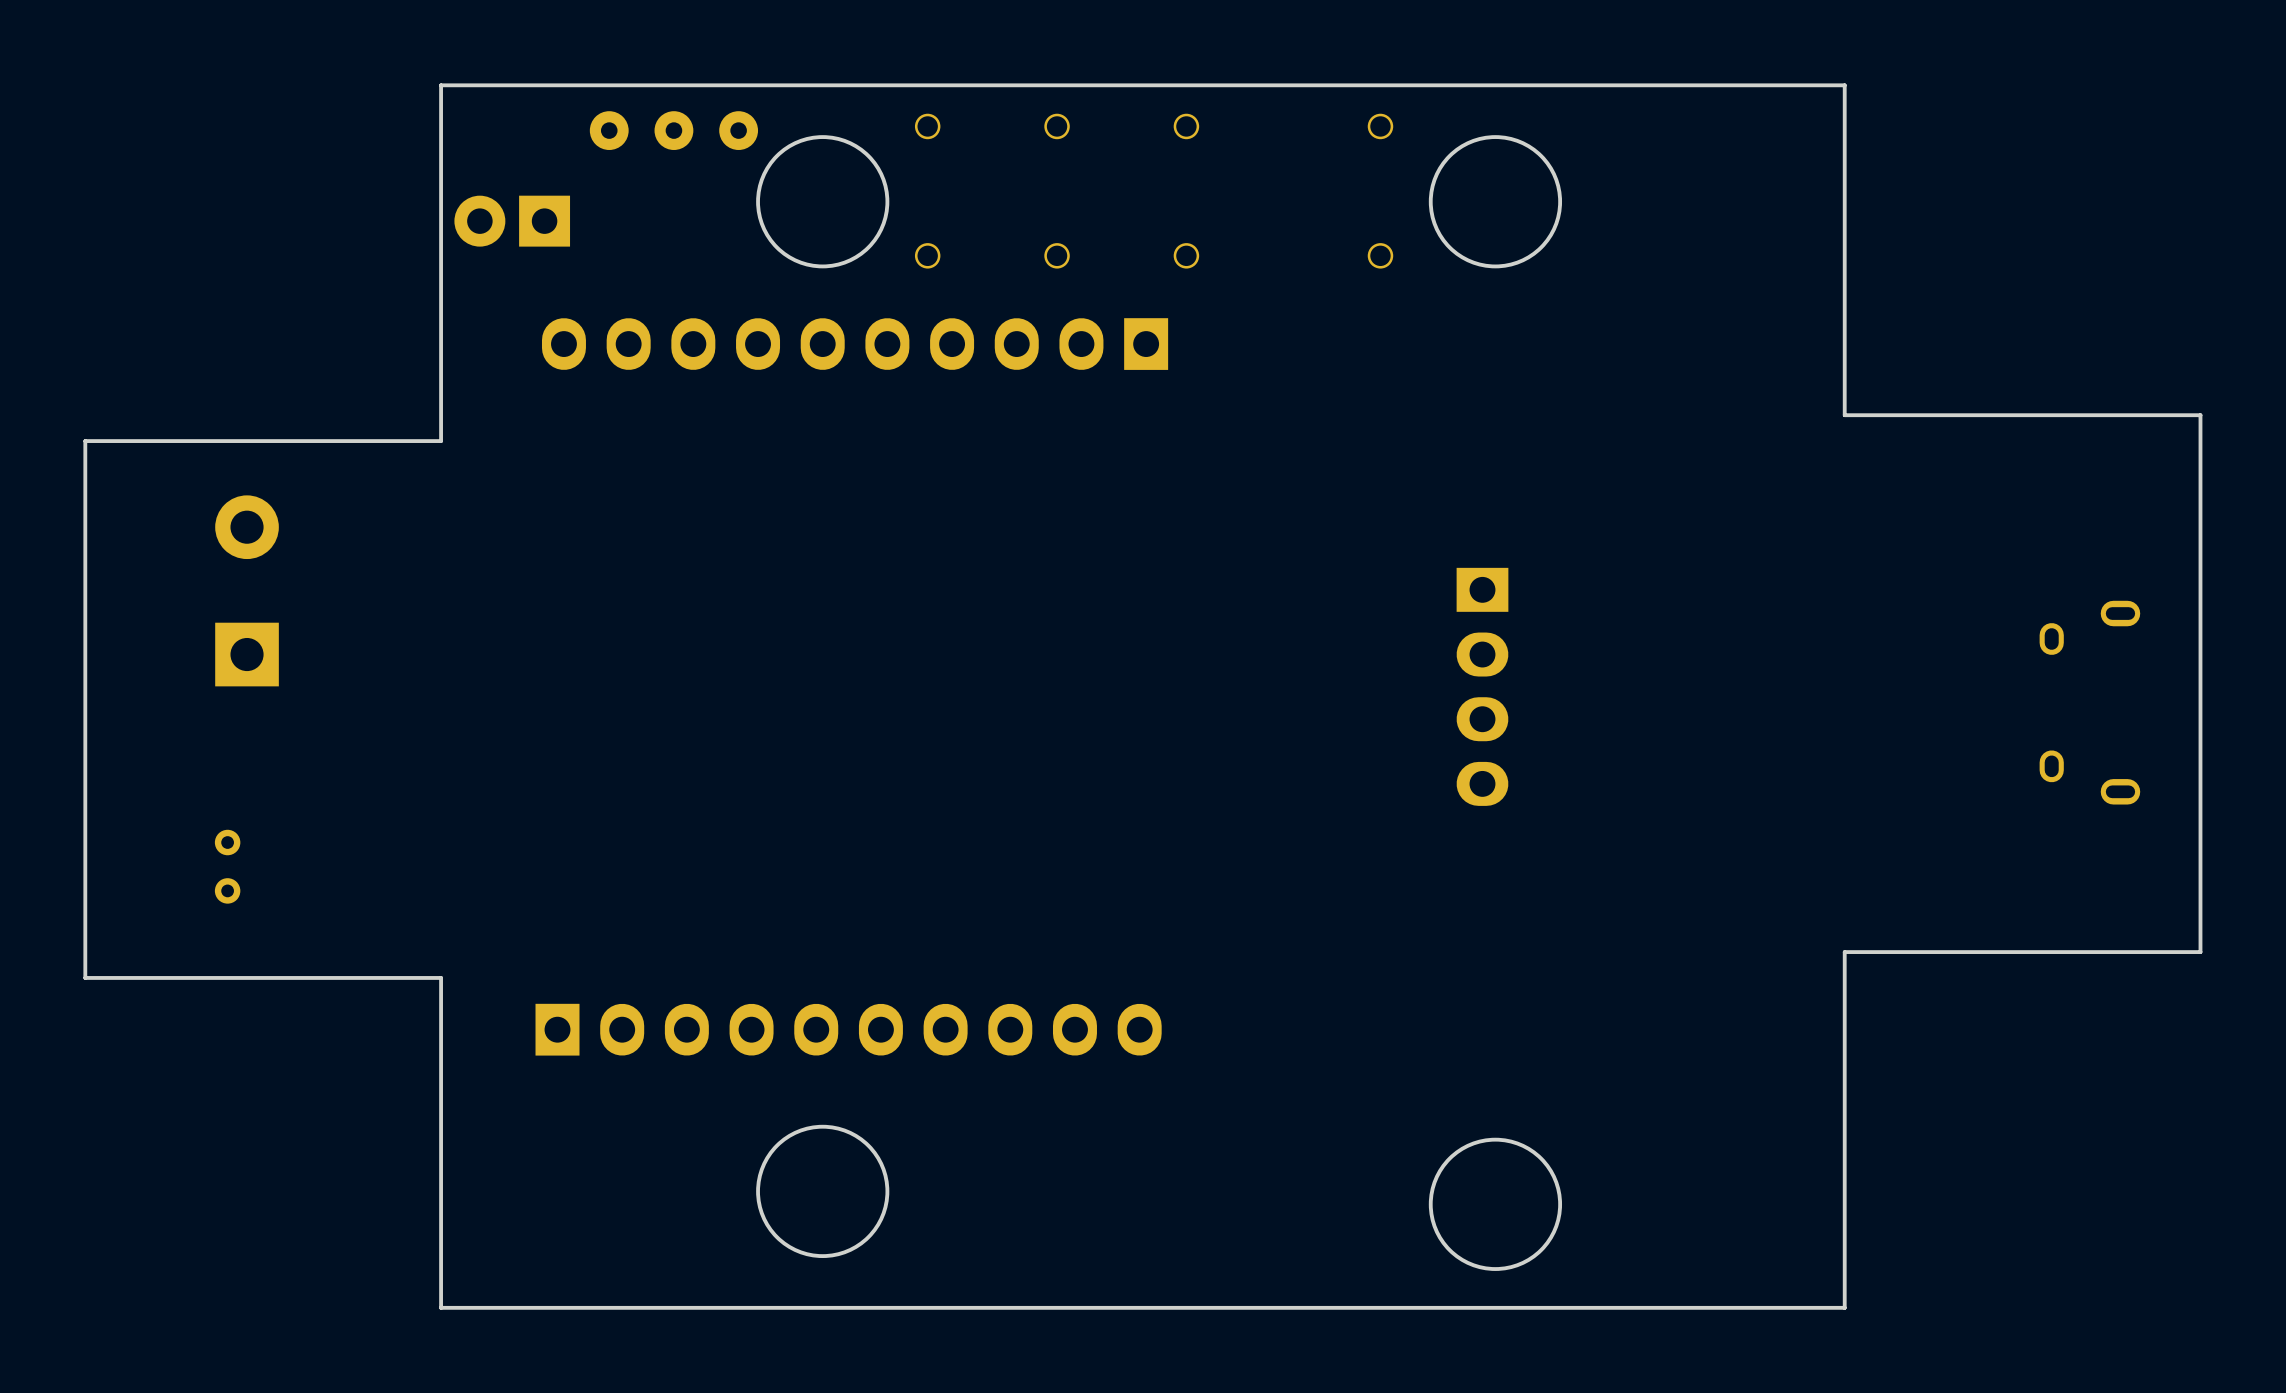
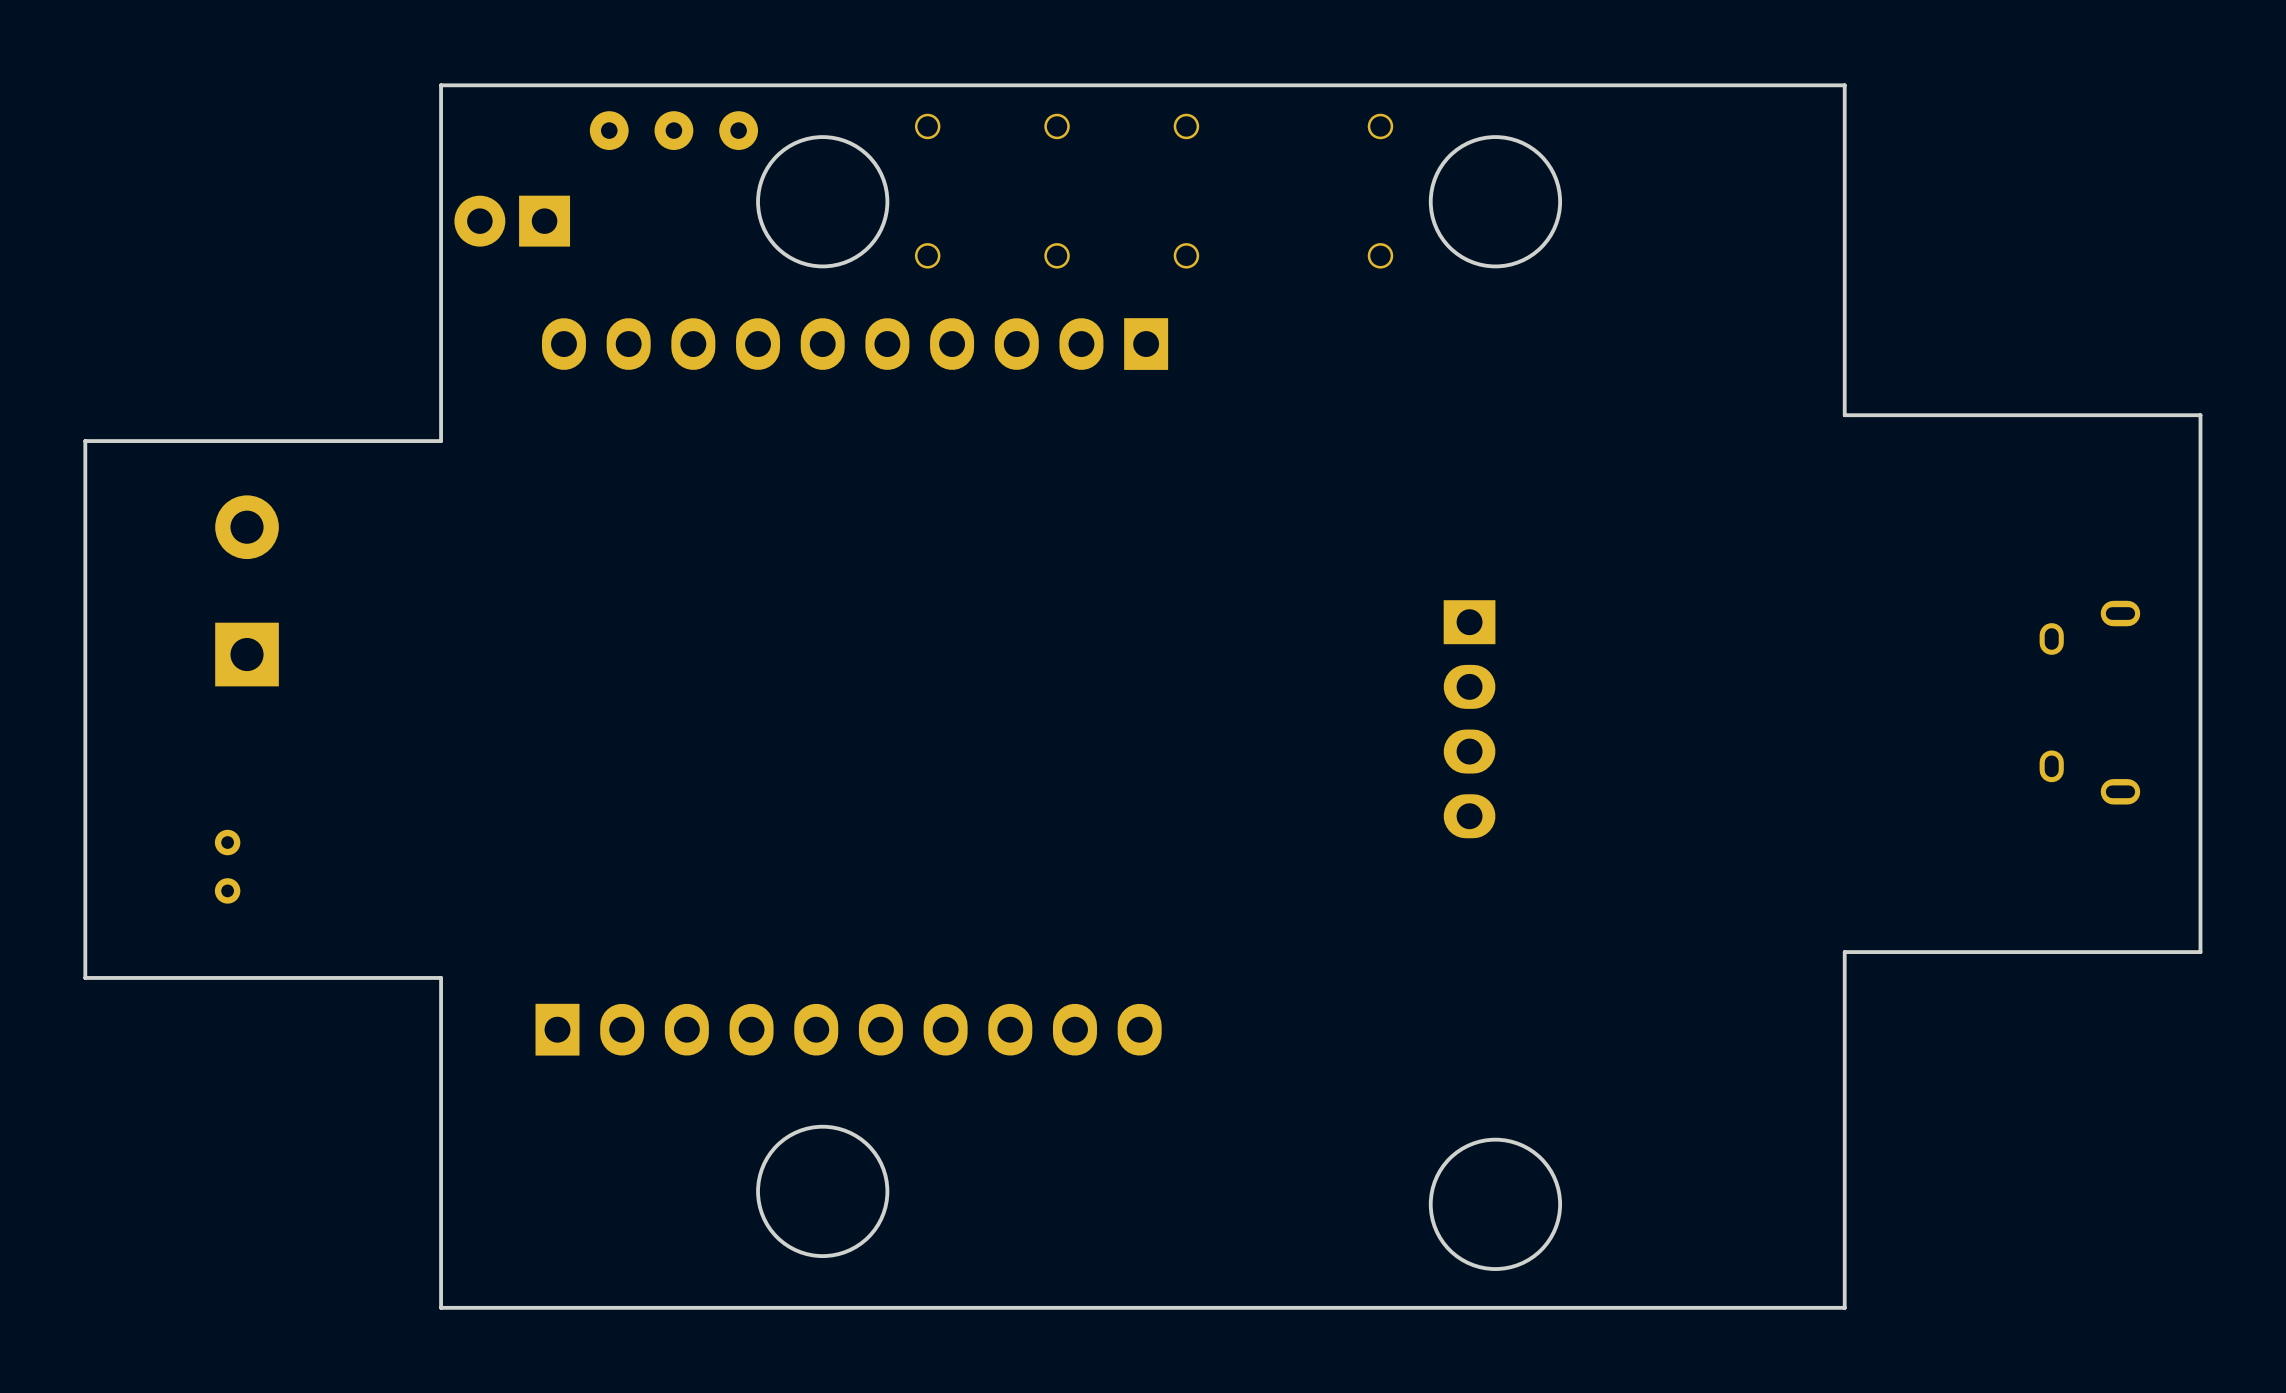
part position: (1482, 686) -> (1469, 719)

